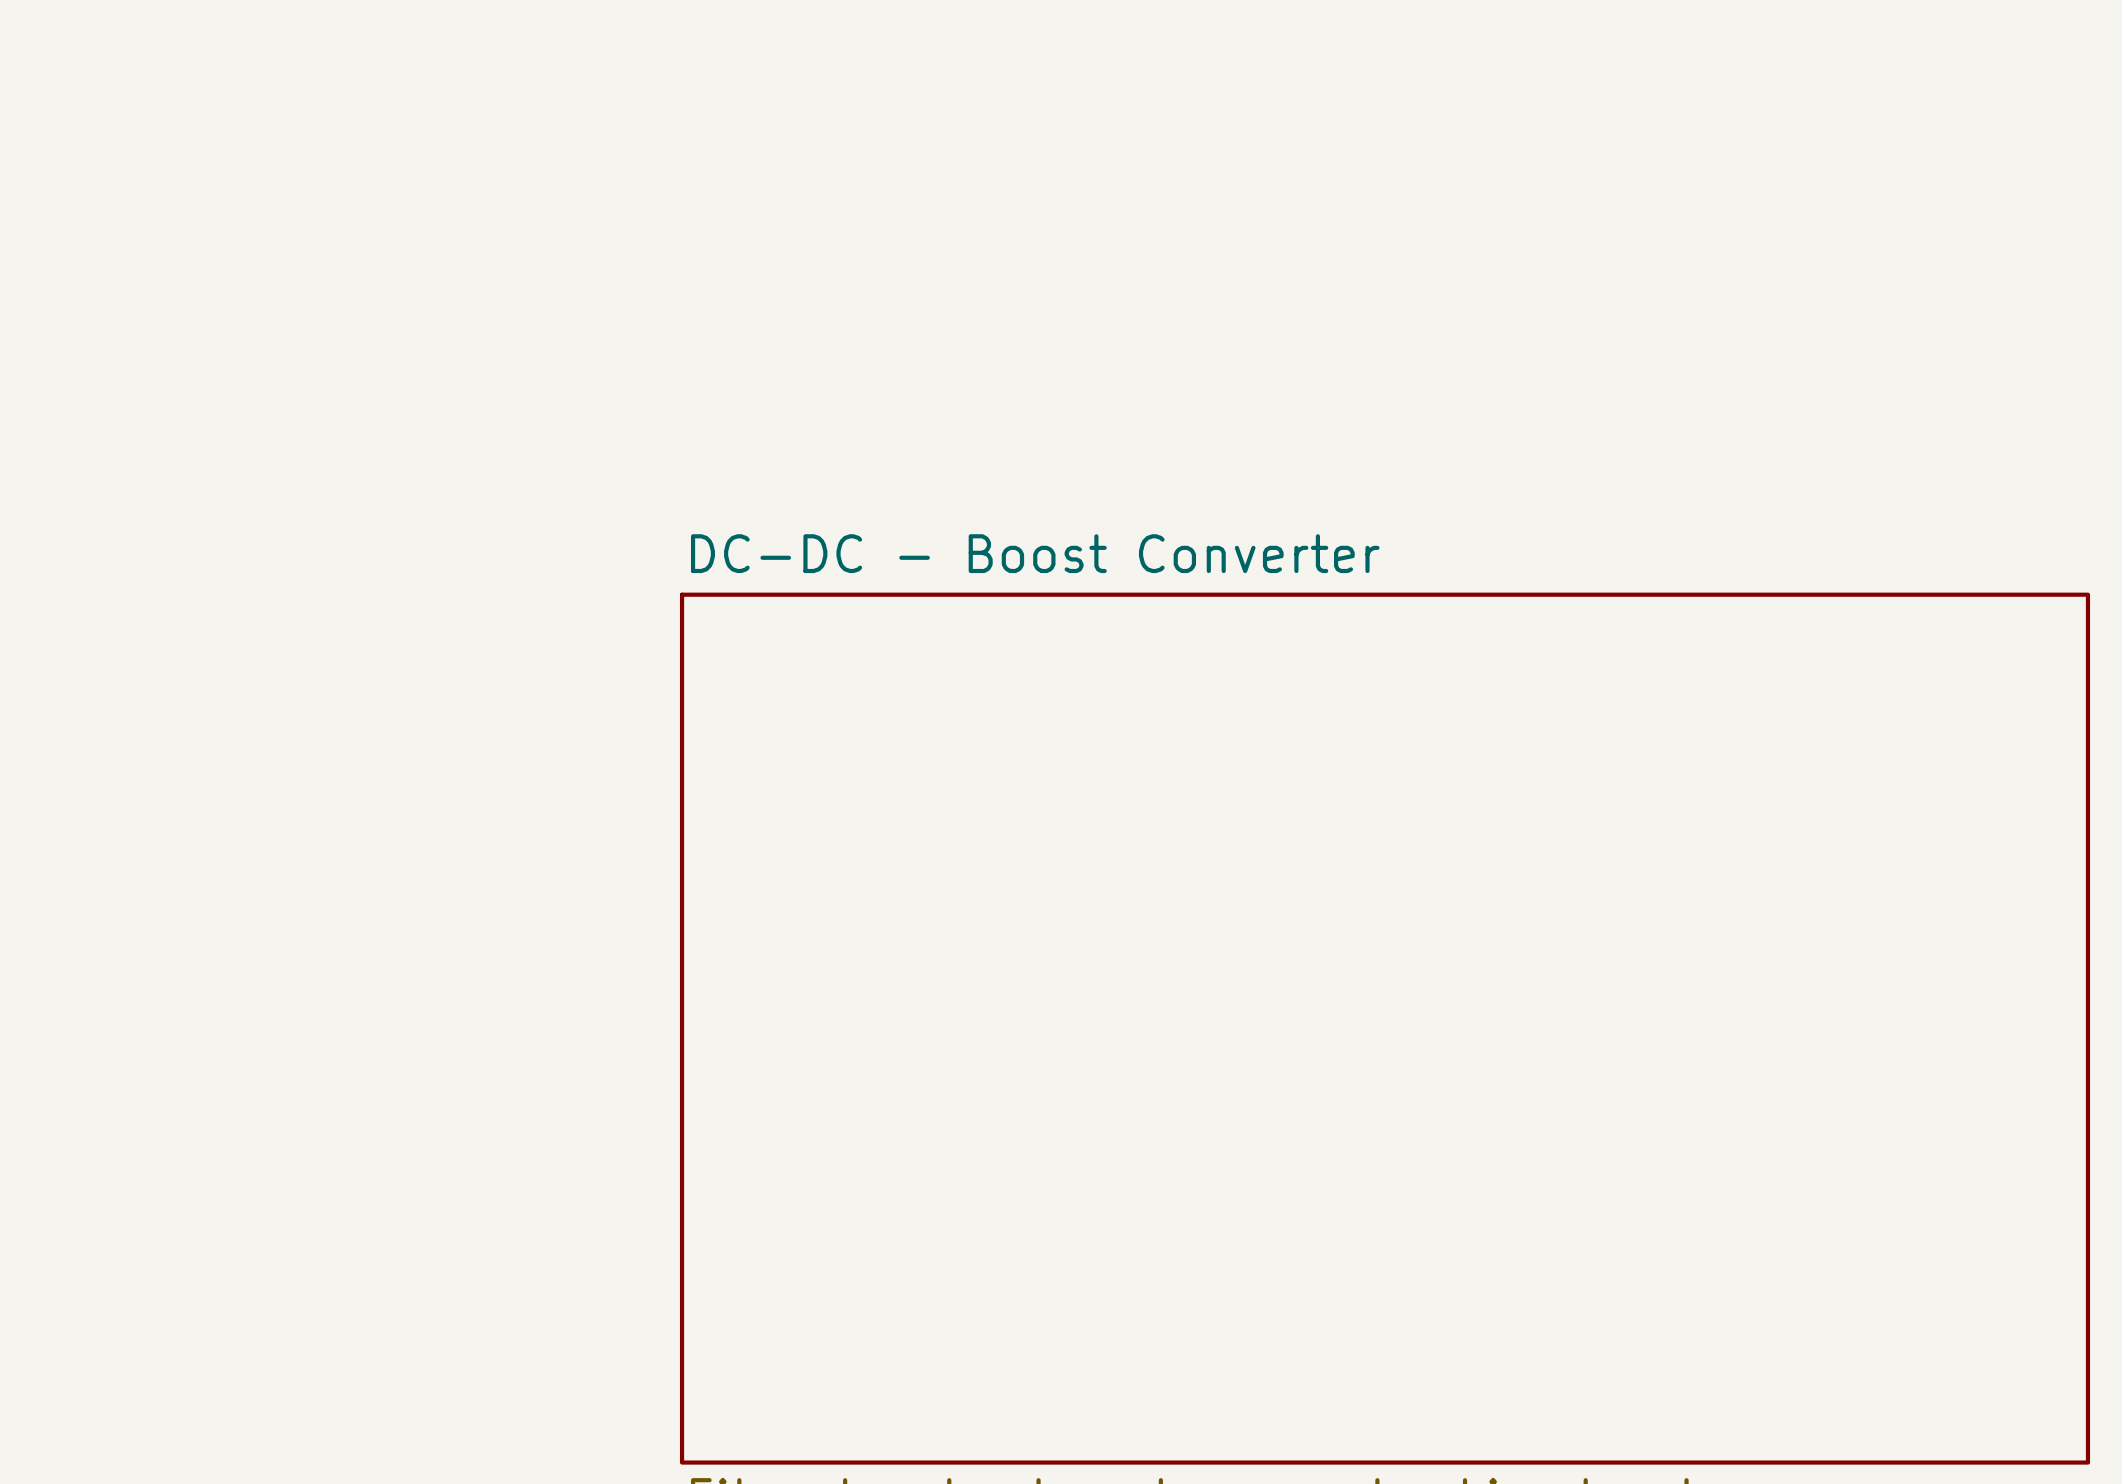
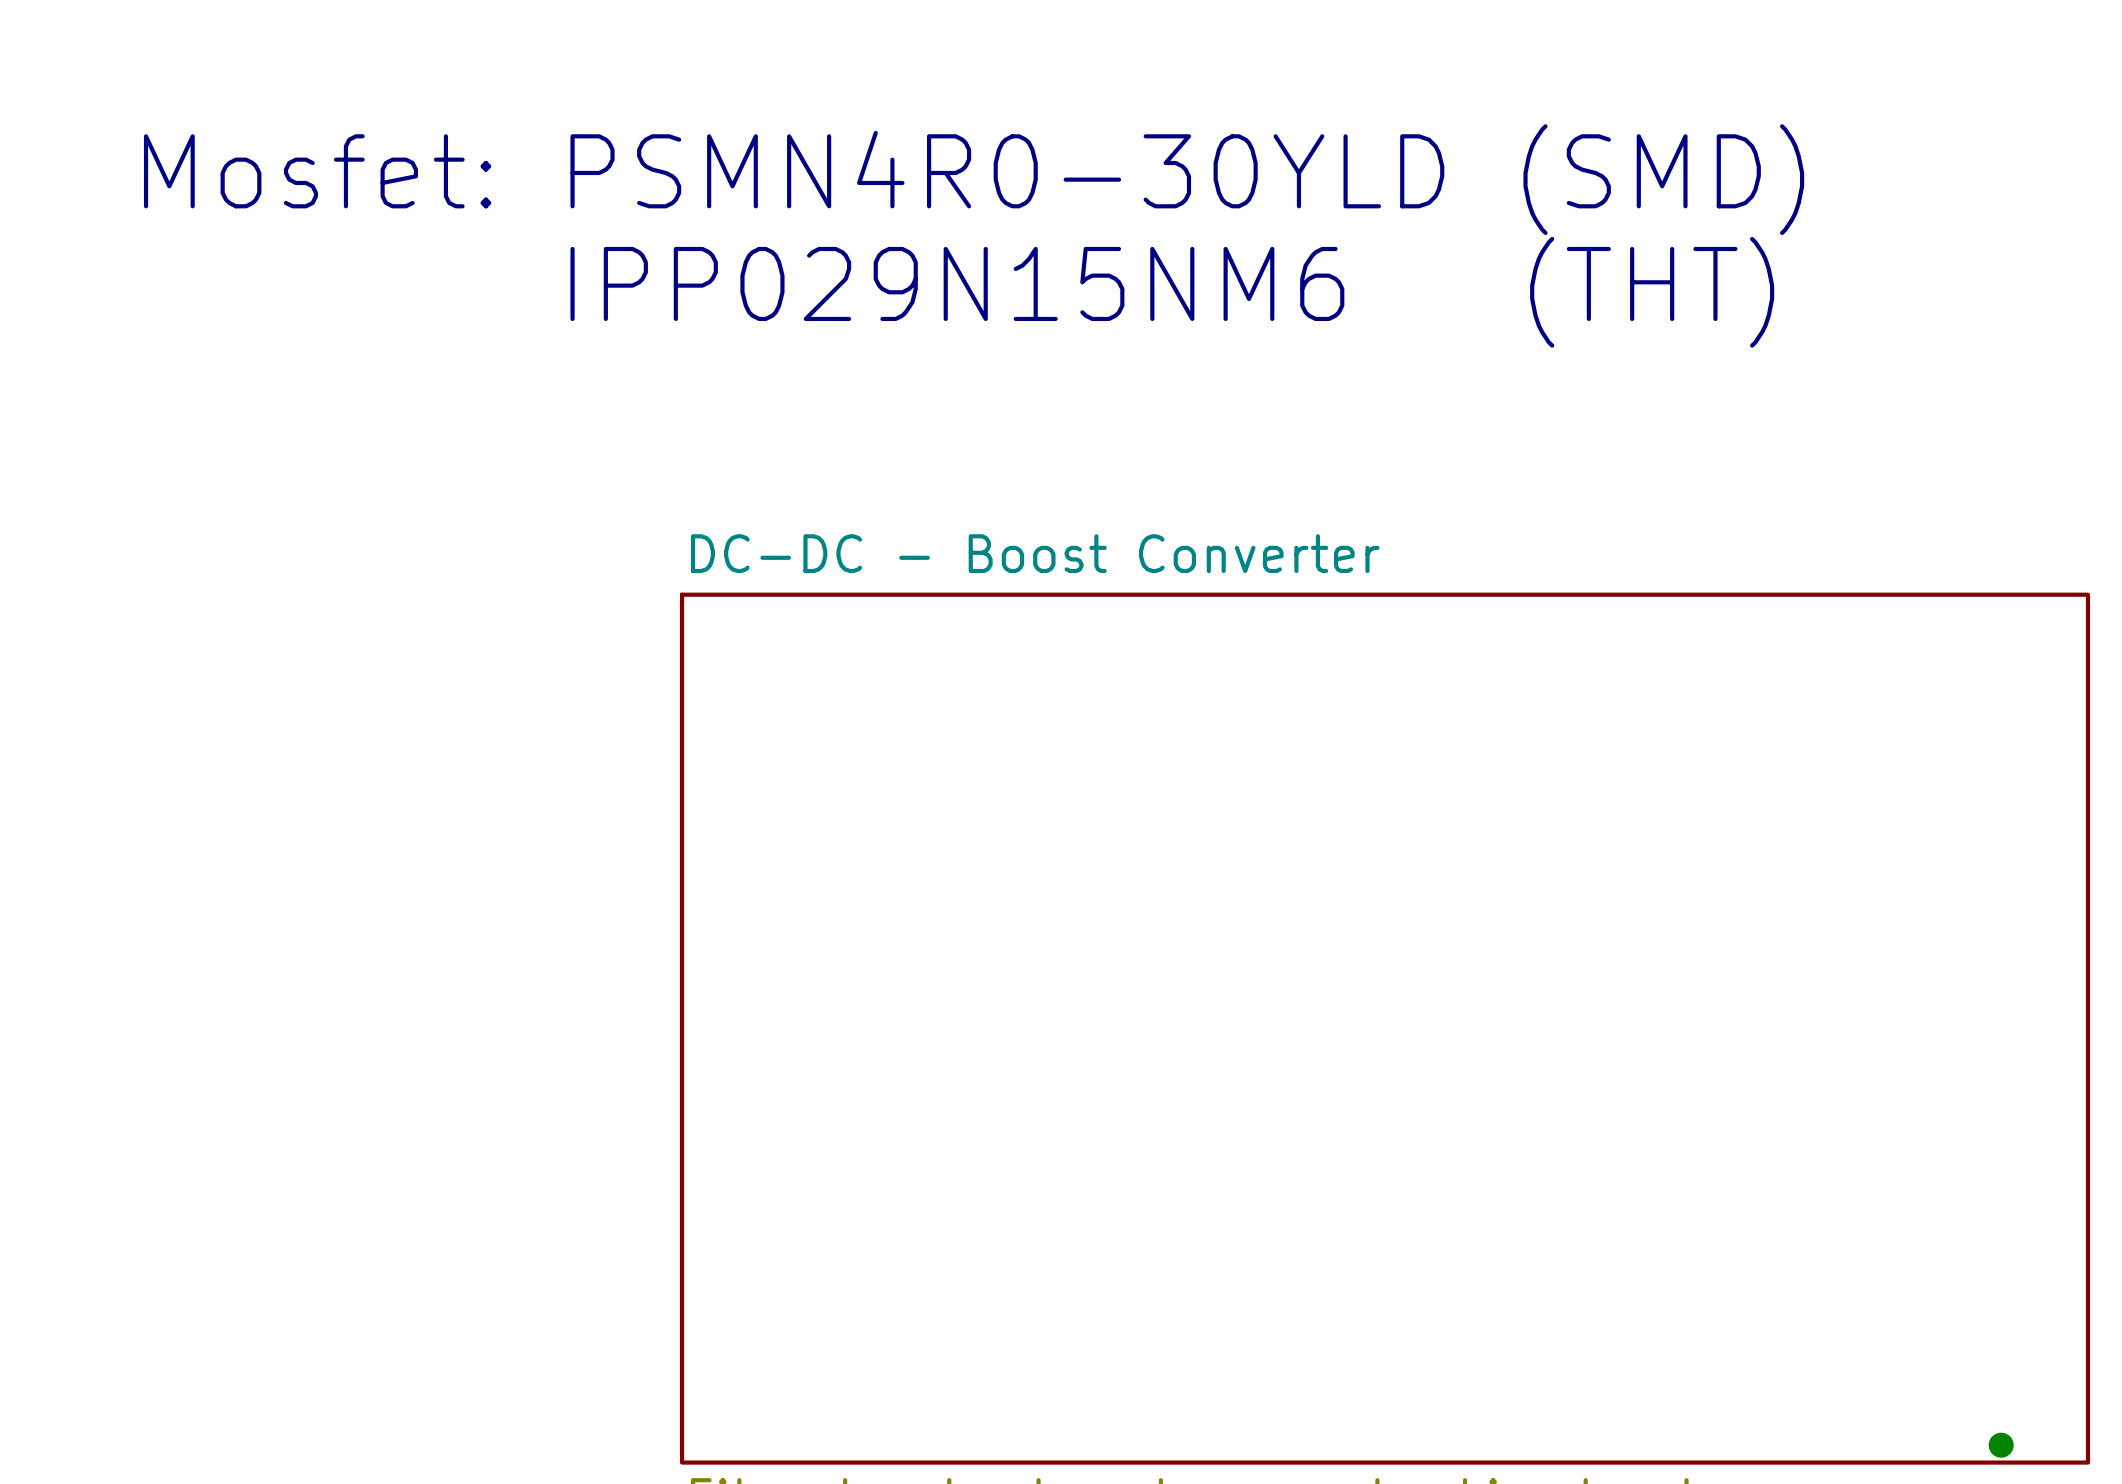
text: none -> Mosfet: PSMN4R0-30YLD (SMD) (974, 179)
text: none -> IPP029N15NM6 (THT) (1172, 292)
junction: none -> (2001, 1445)

